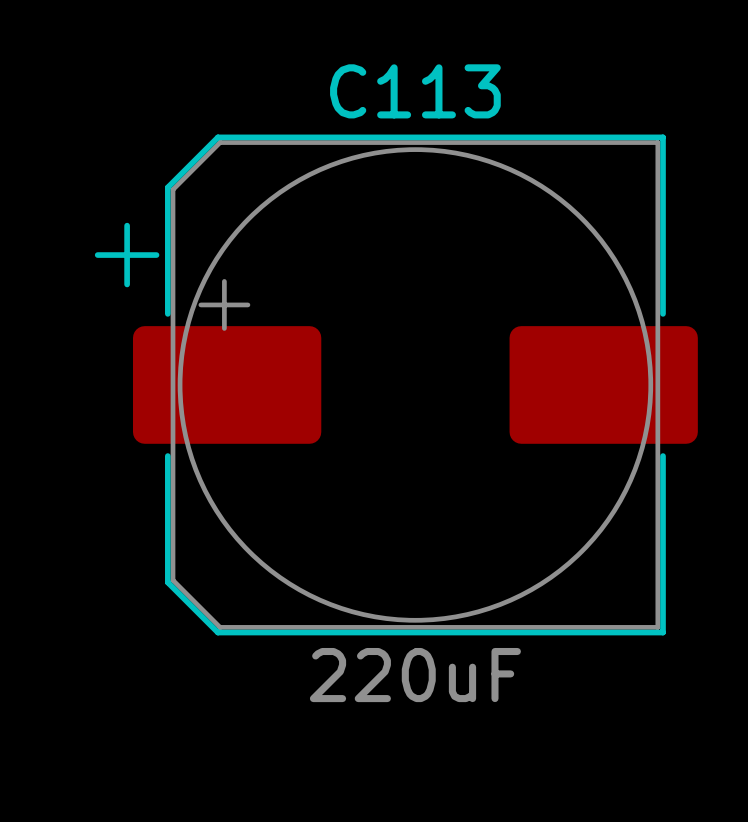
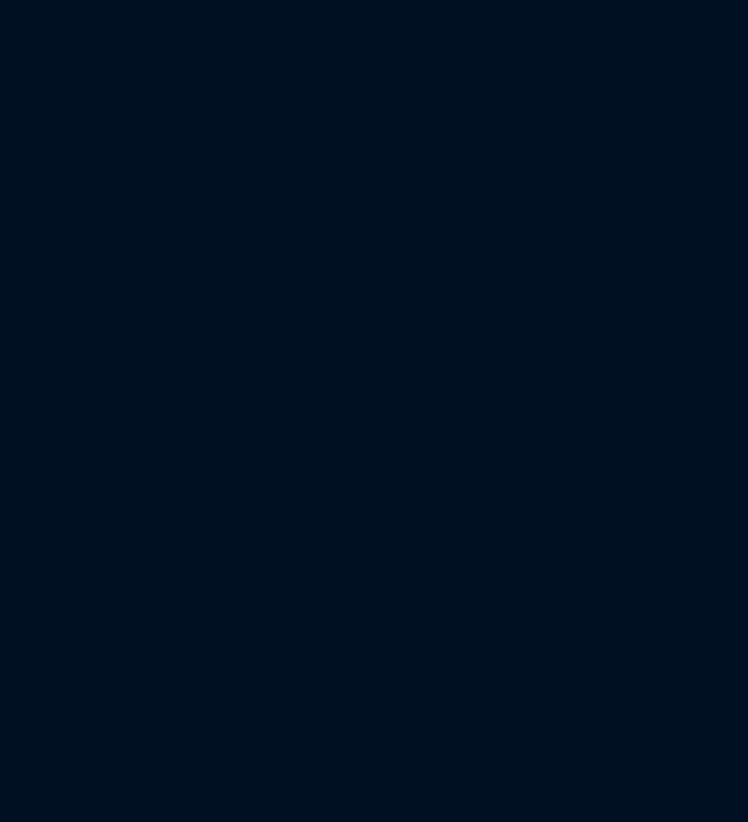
C113: 220uF (396, 384) -> none

